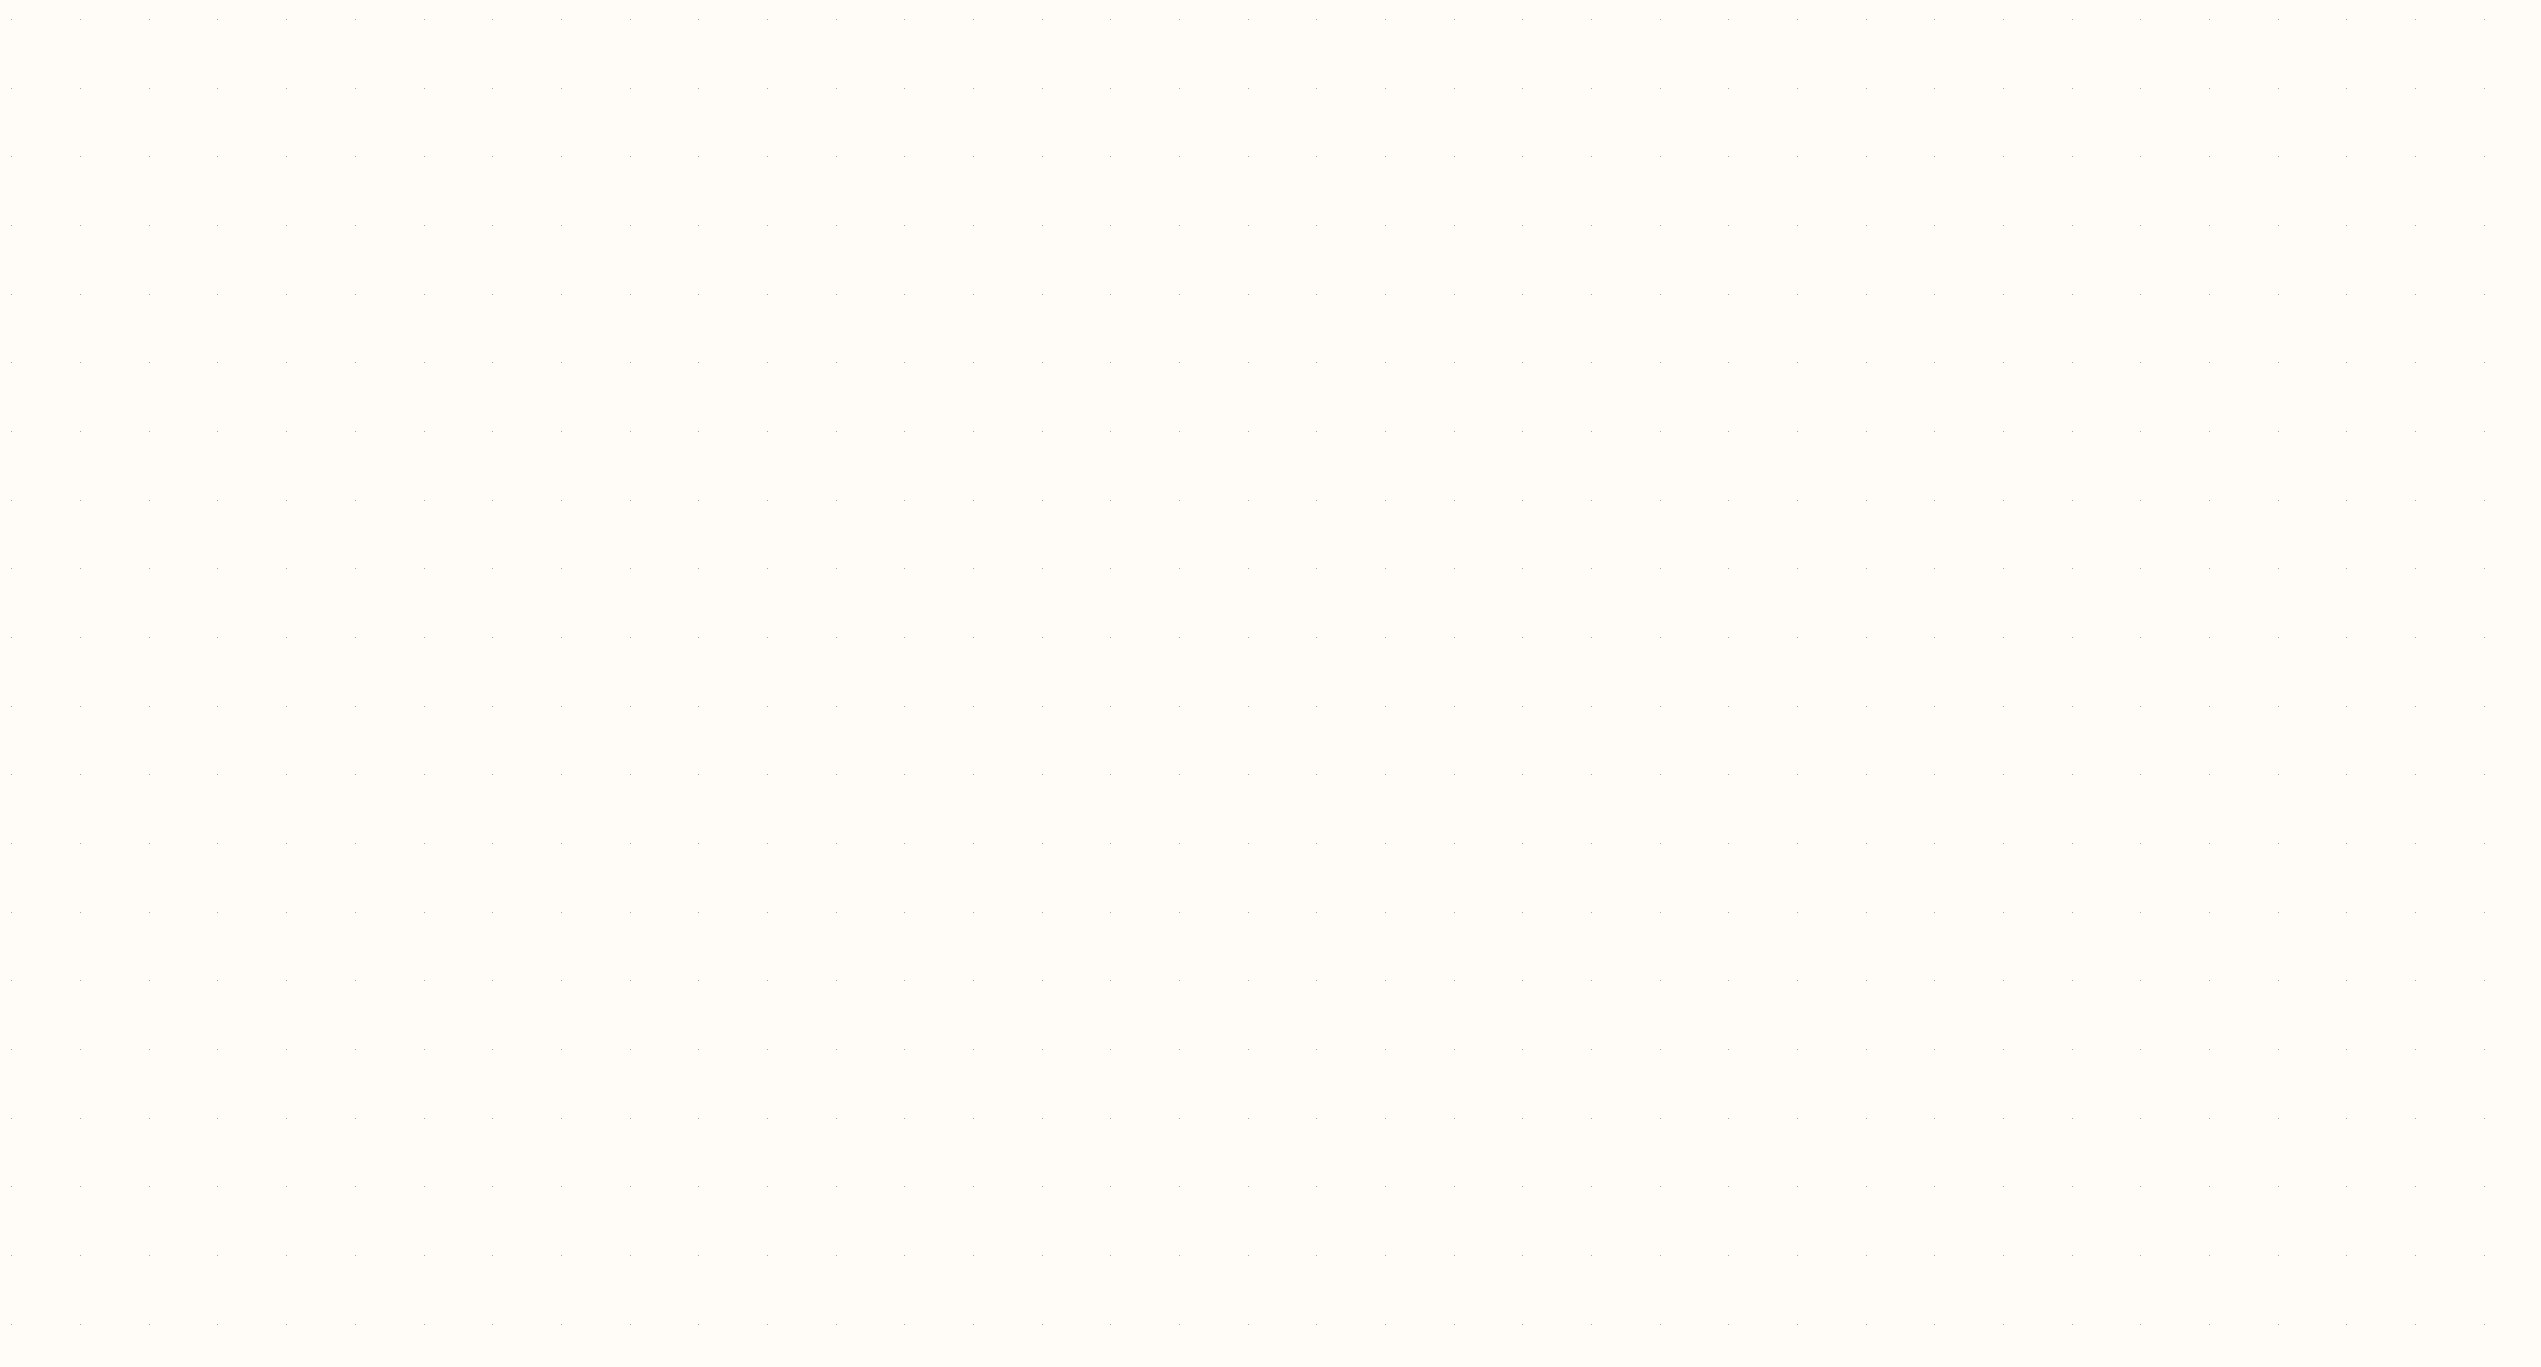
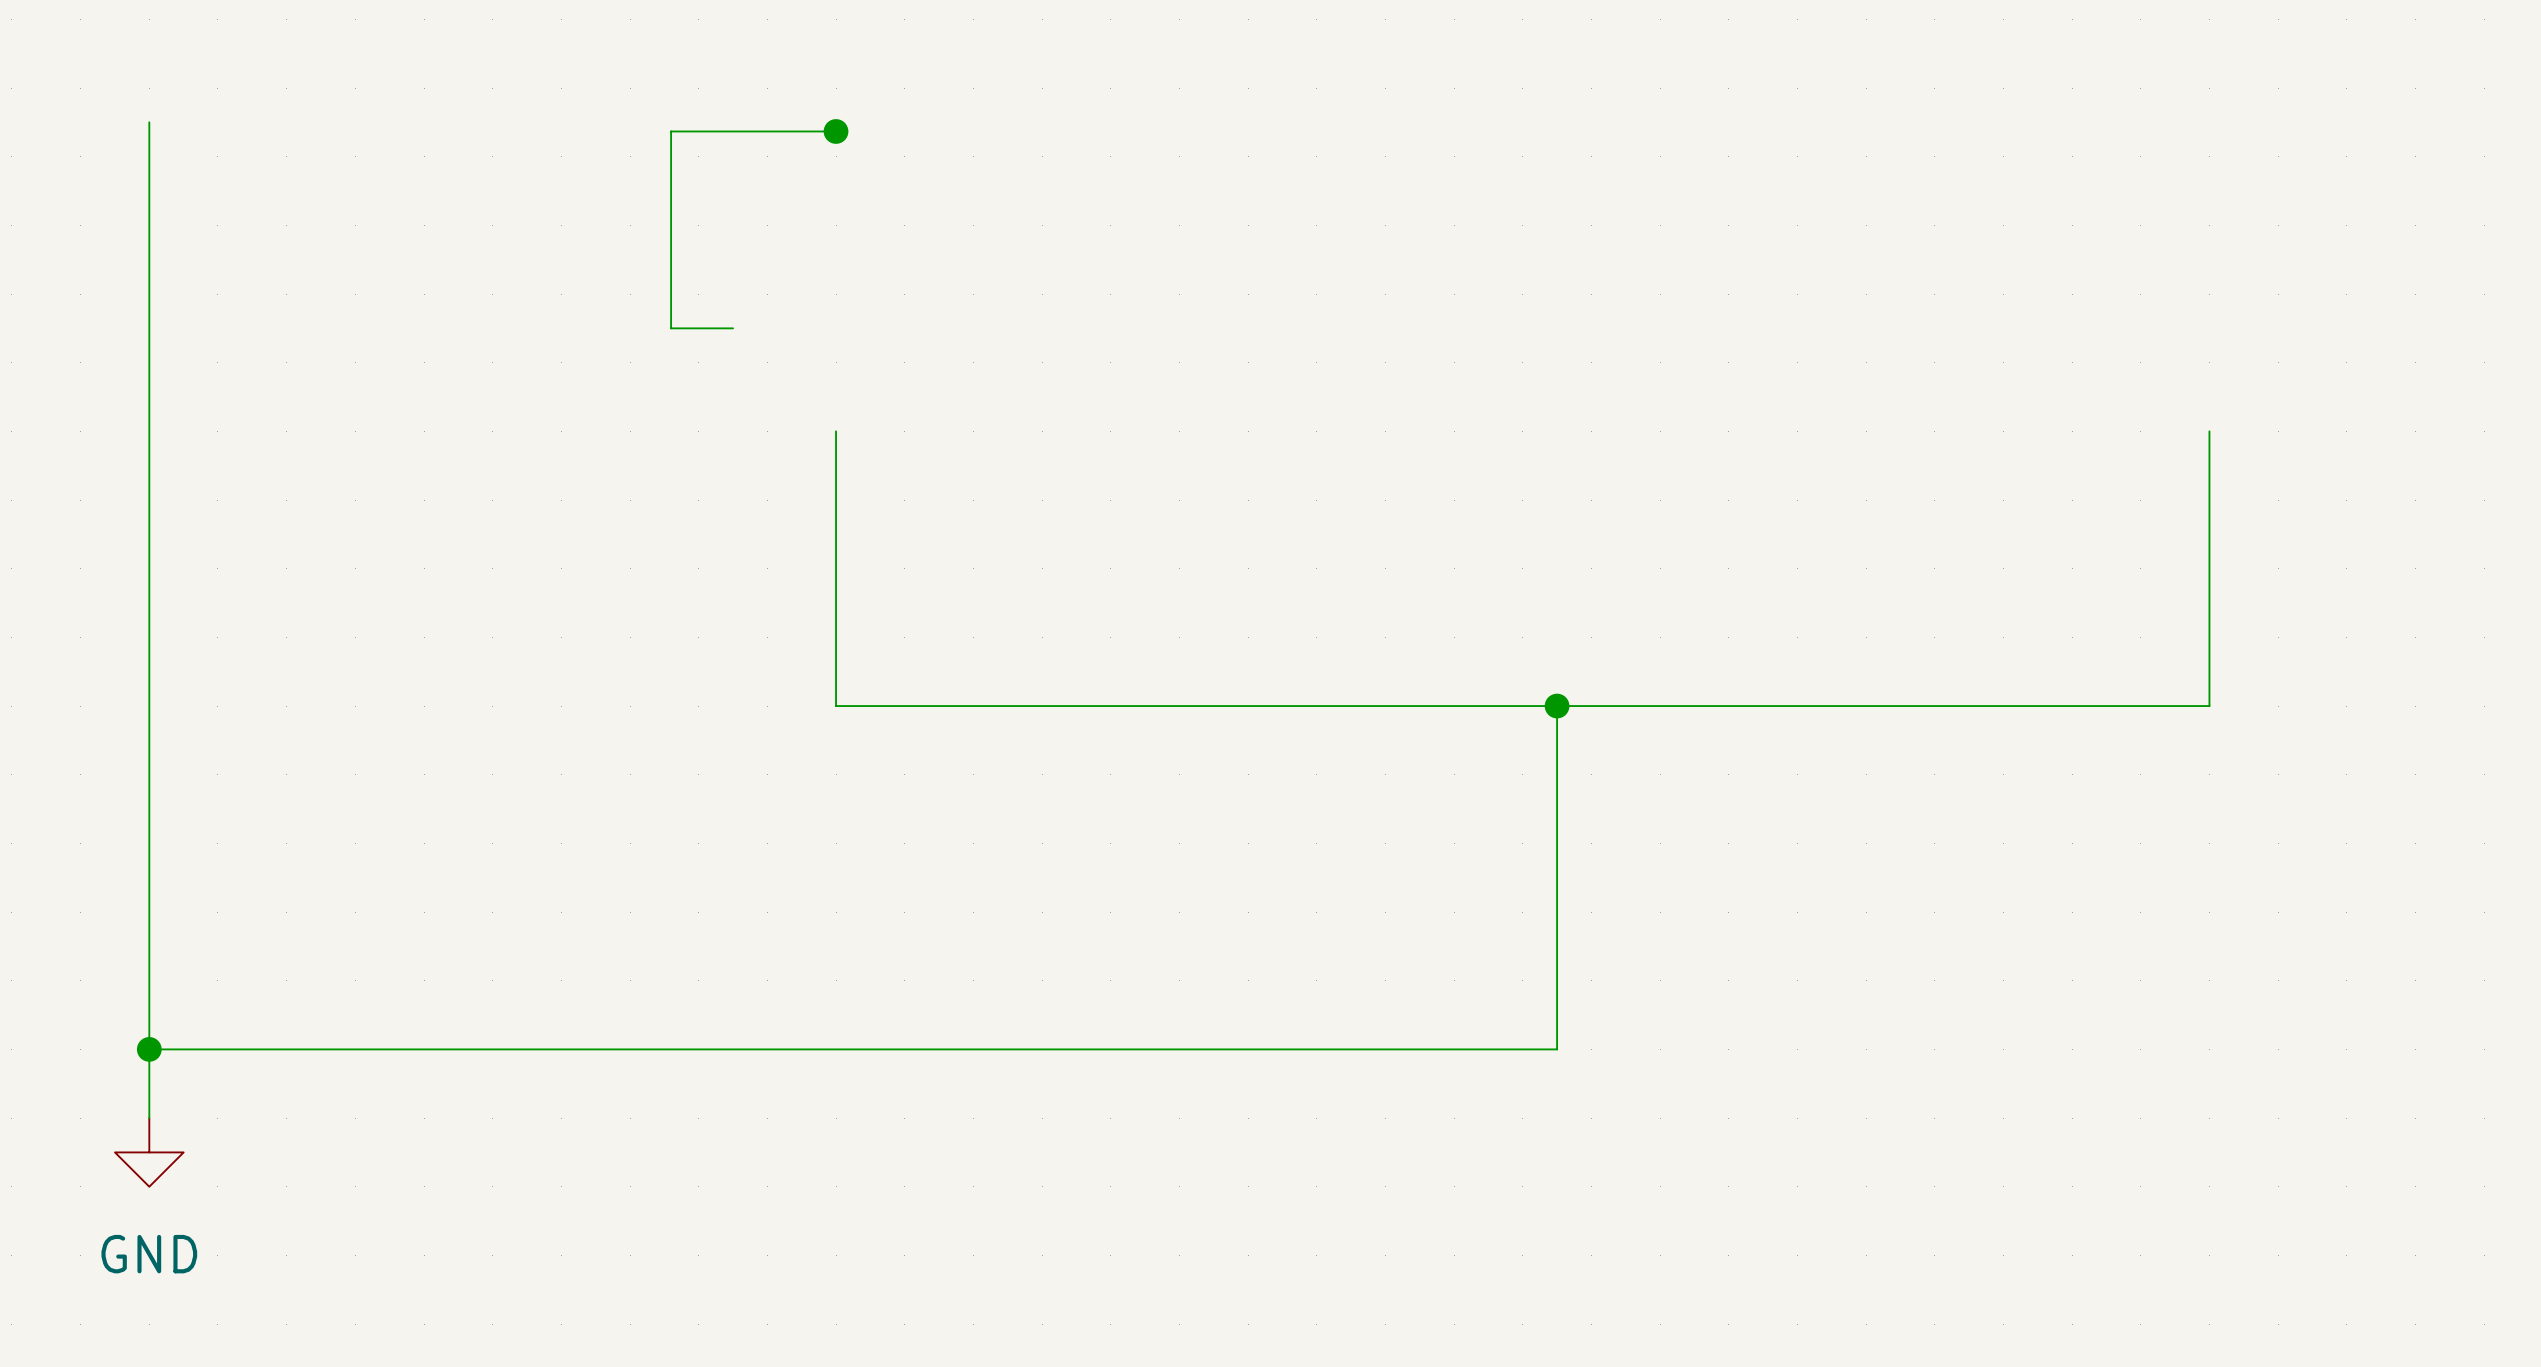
wire: none -> (149, 122) (149, 1118)
wire: none -> (836, 131) (671, 131) (671, 328) (733, 328)
junction: none -> (836, 131)
wire: none -> (836, 431) (836, 706) (2209, 706) (2209, 431)
wire: none -> (1557, 706) (1557, 1049) (149, 1049)
junction: none -> (1557, 706)
junction: none -> (149, 1049)
power symbol: none -> GND (149, 1152)

